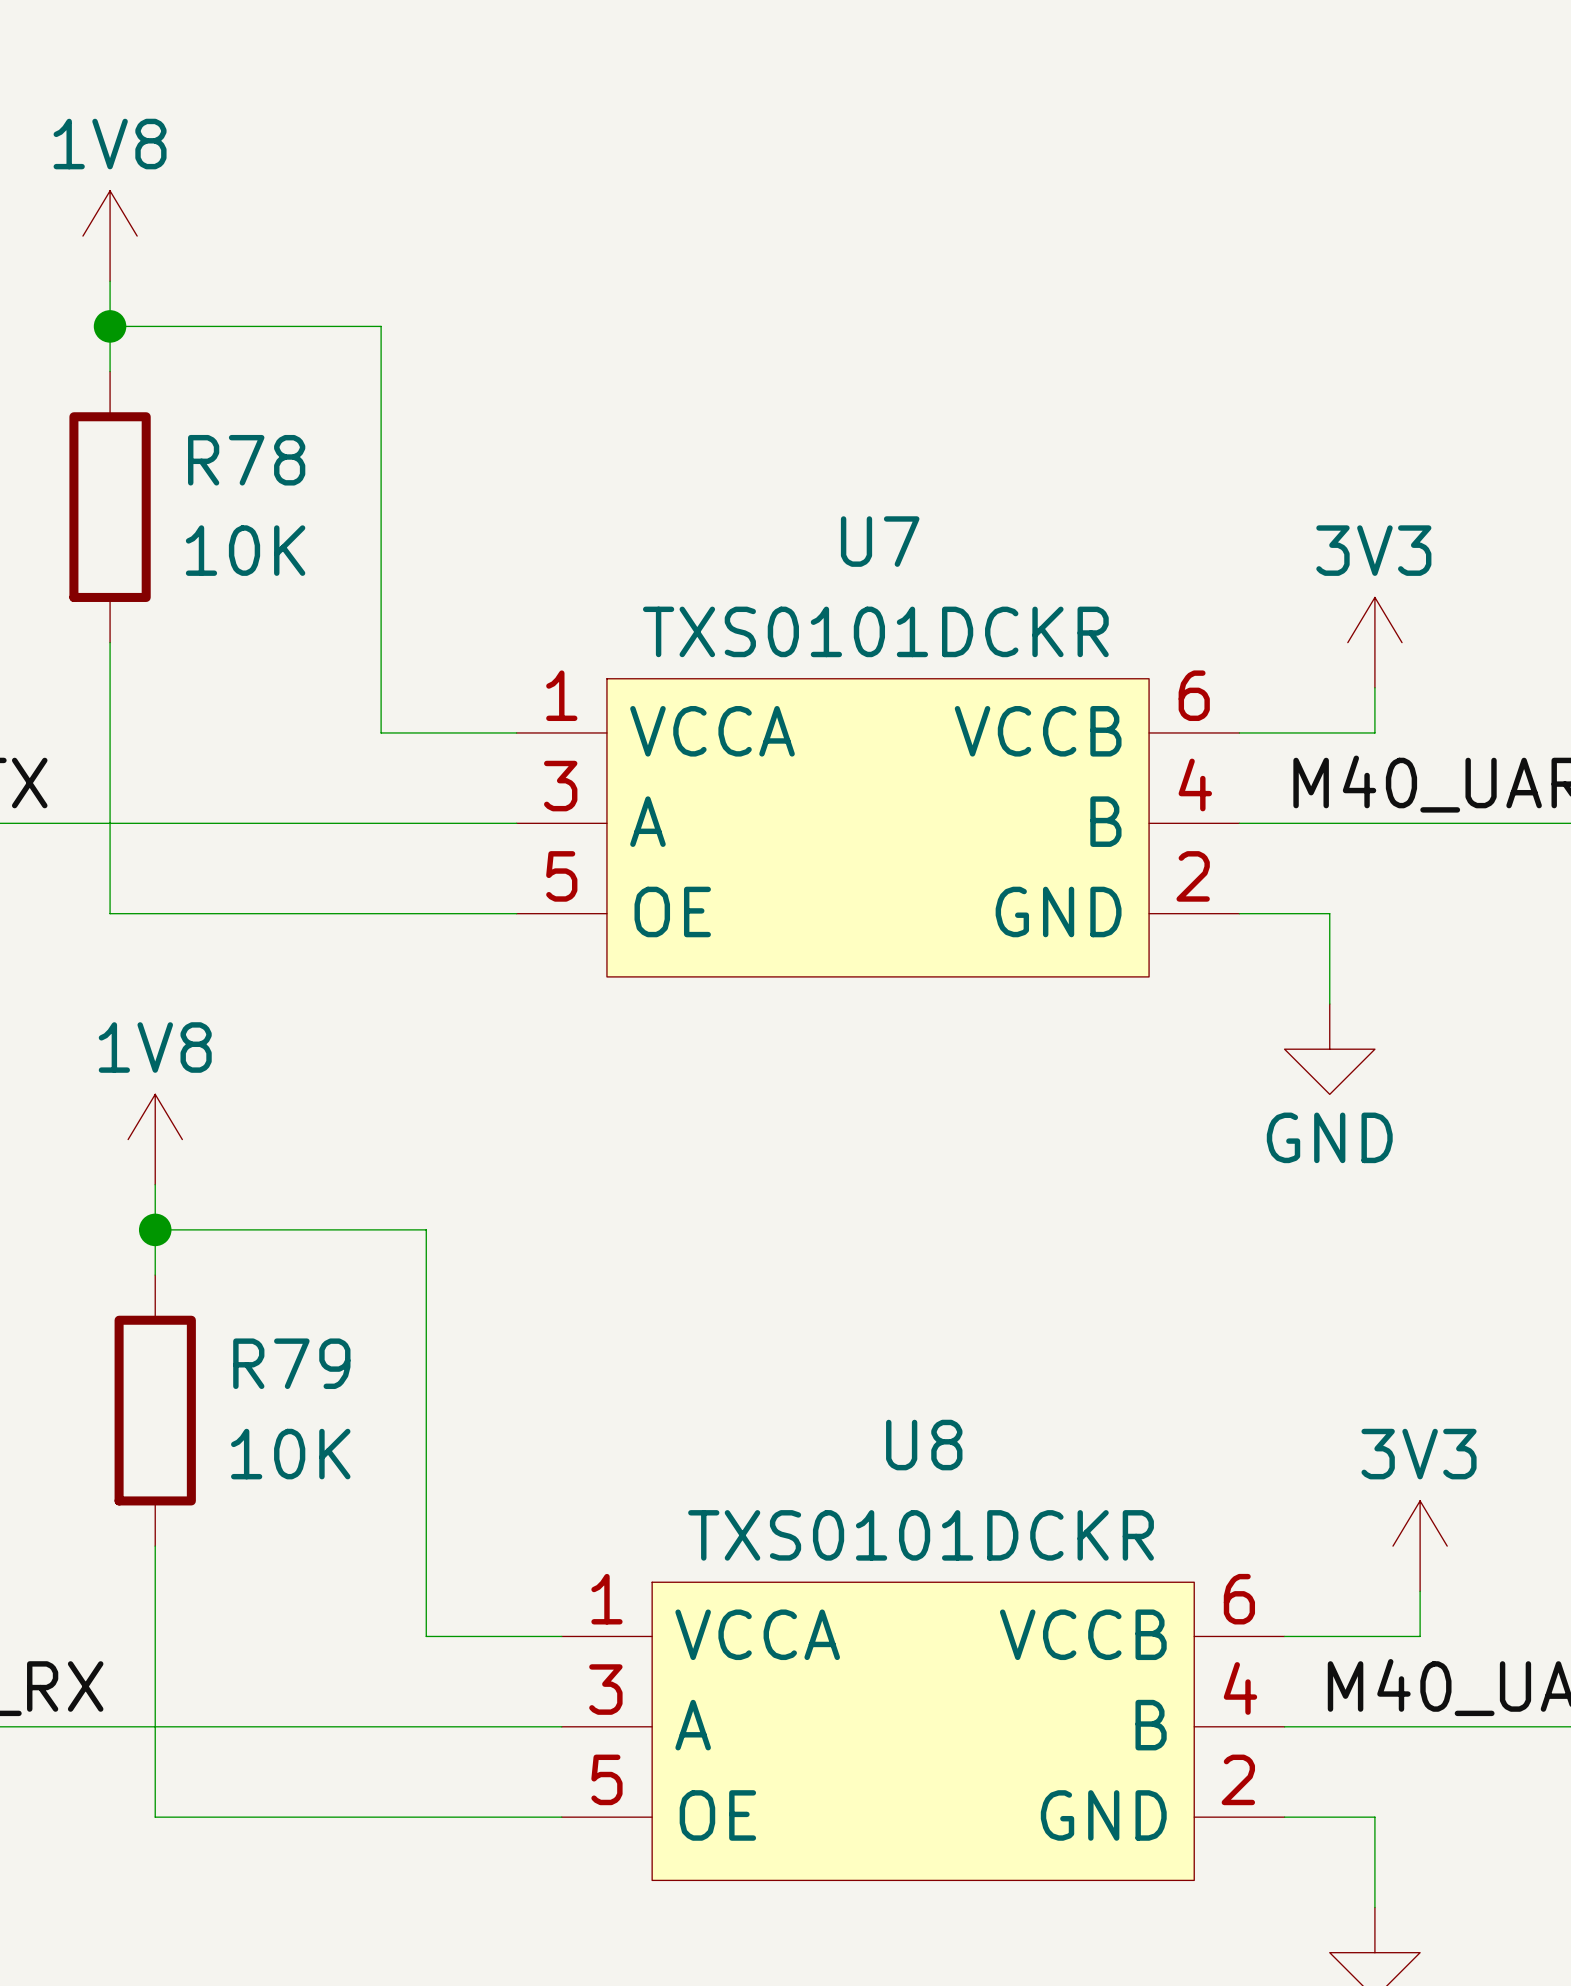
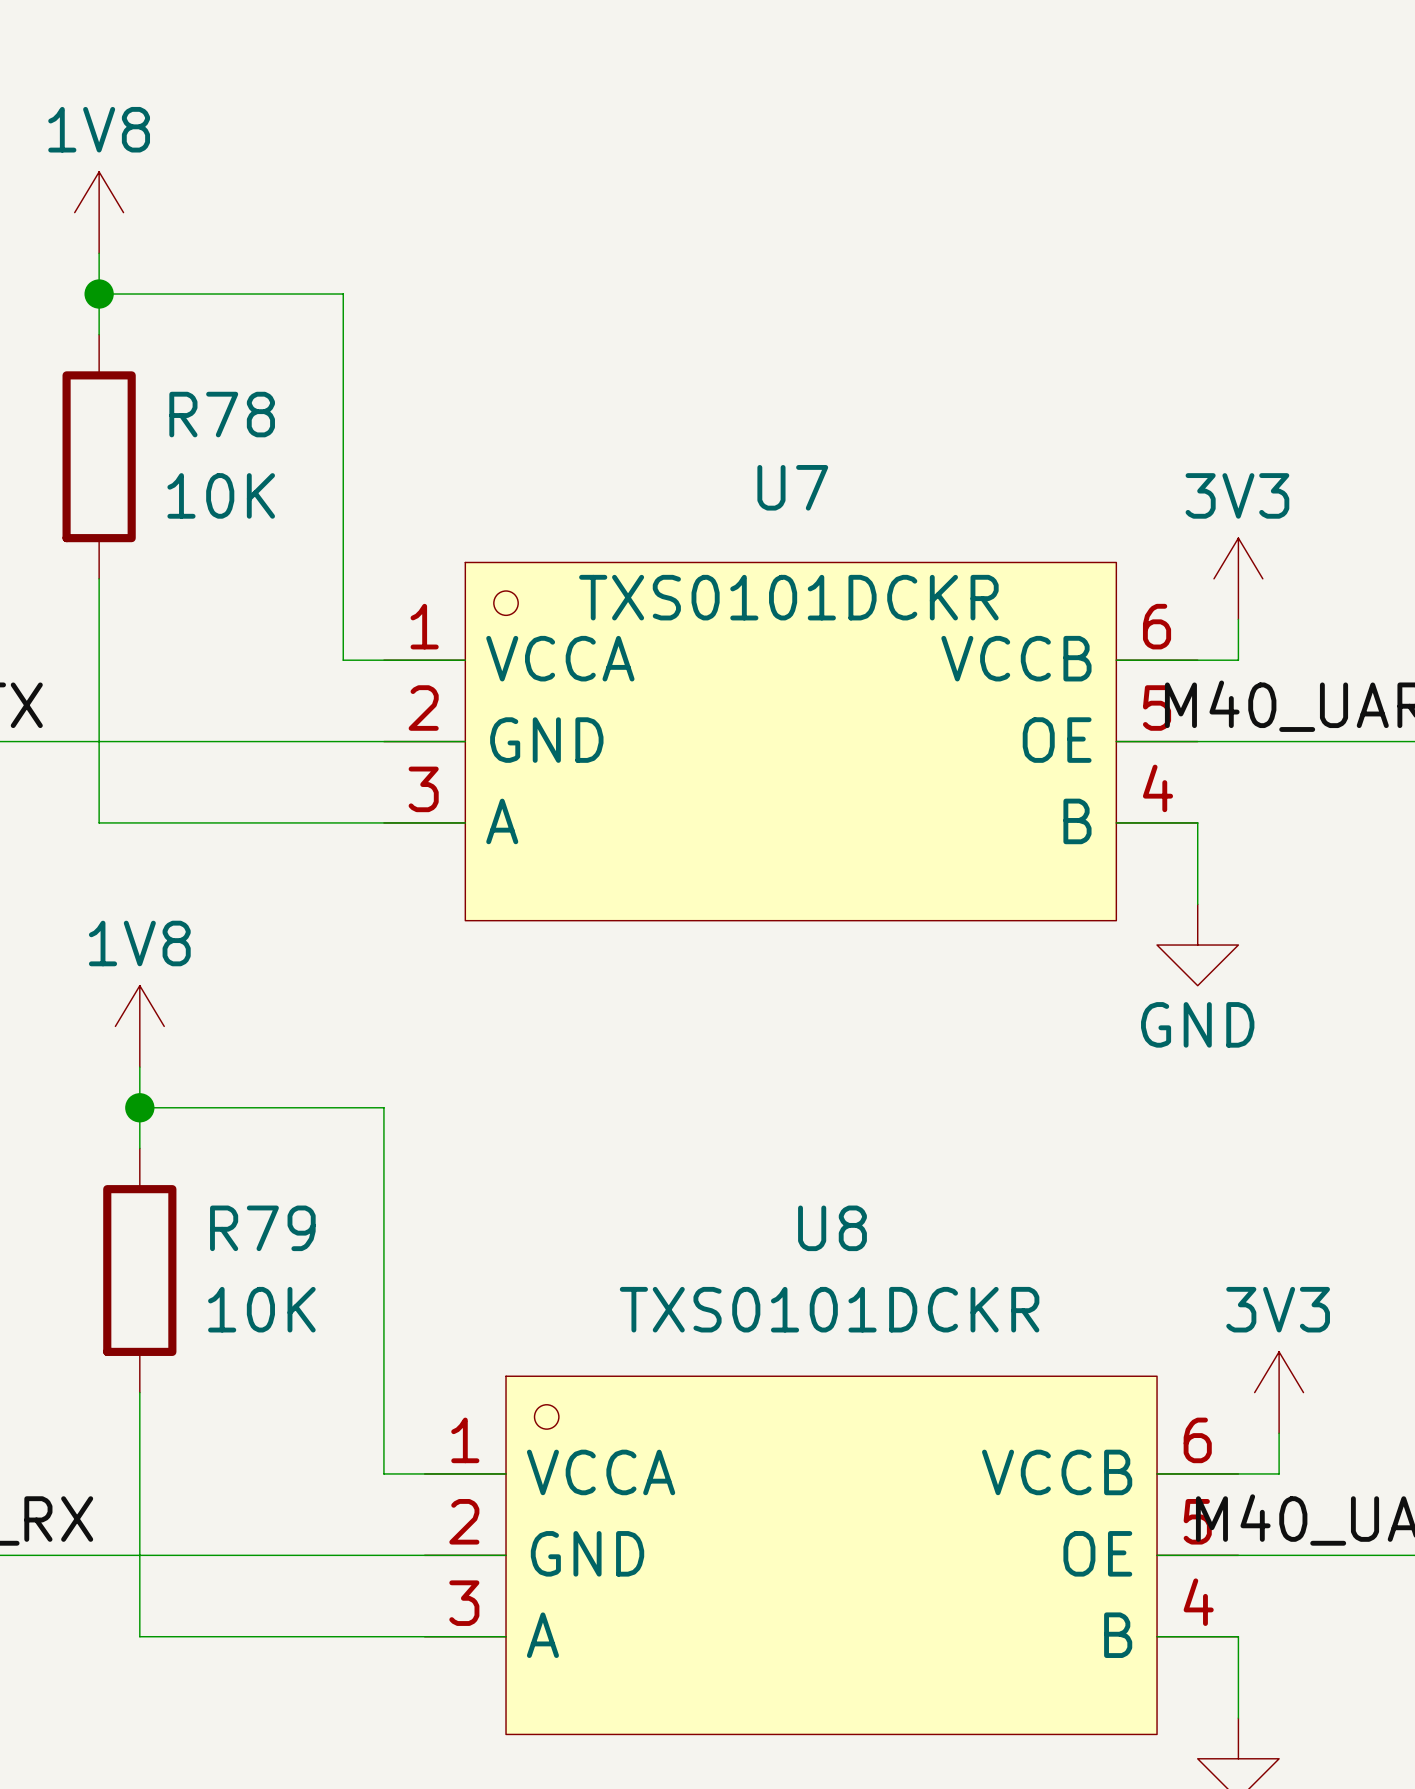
U7 symbol: [516, 678, 1240, 977] -> [383, 562, 1198, 921]
U8 name position: U8 (924, 1445) -> U8 (832, 1228)
U8 value position: TXS0101DCKR (921, 1535) -> TXS0101DCKR (829, 1309)
U8 symbol: [561, 1582, 1285, 1881] -> [424, 1376, 1239, 1735]

